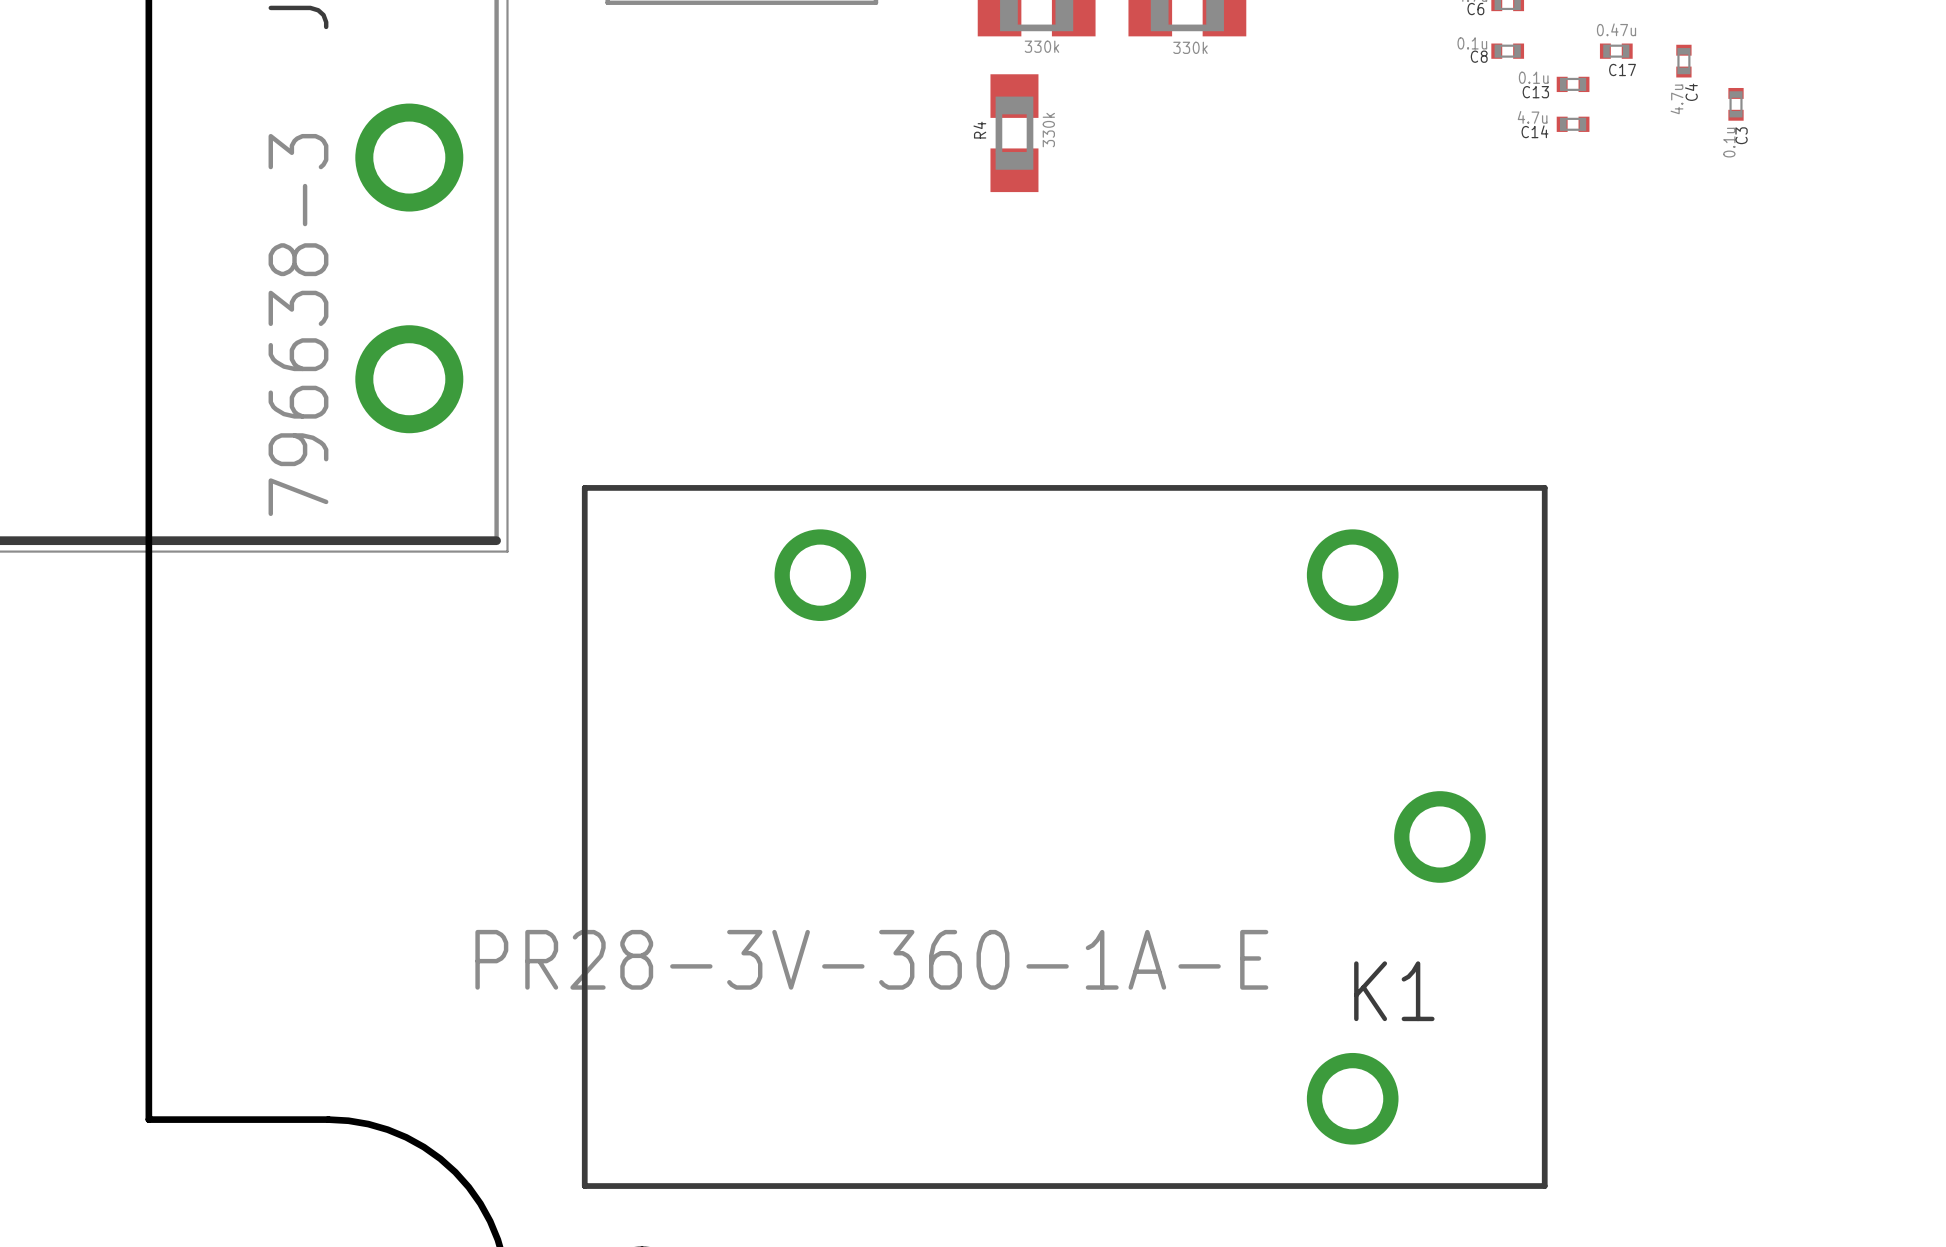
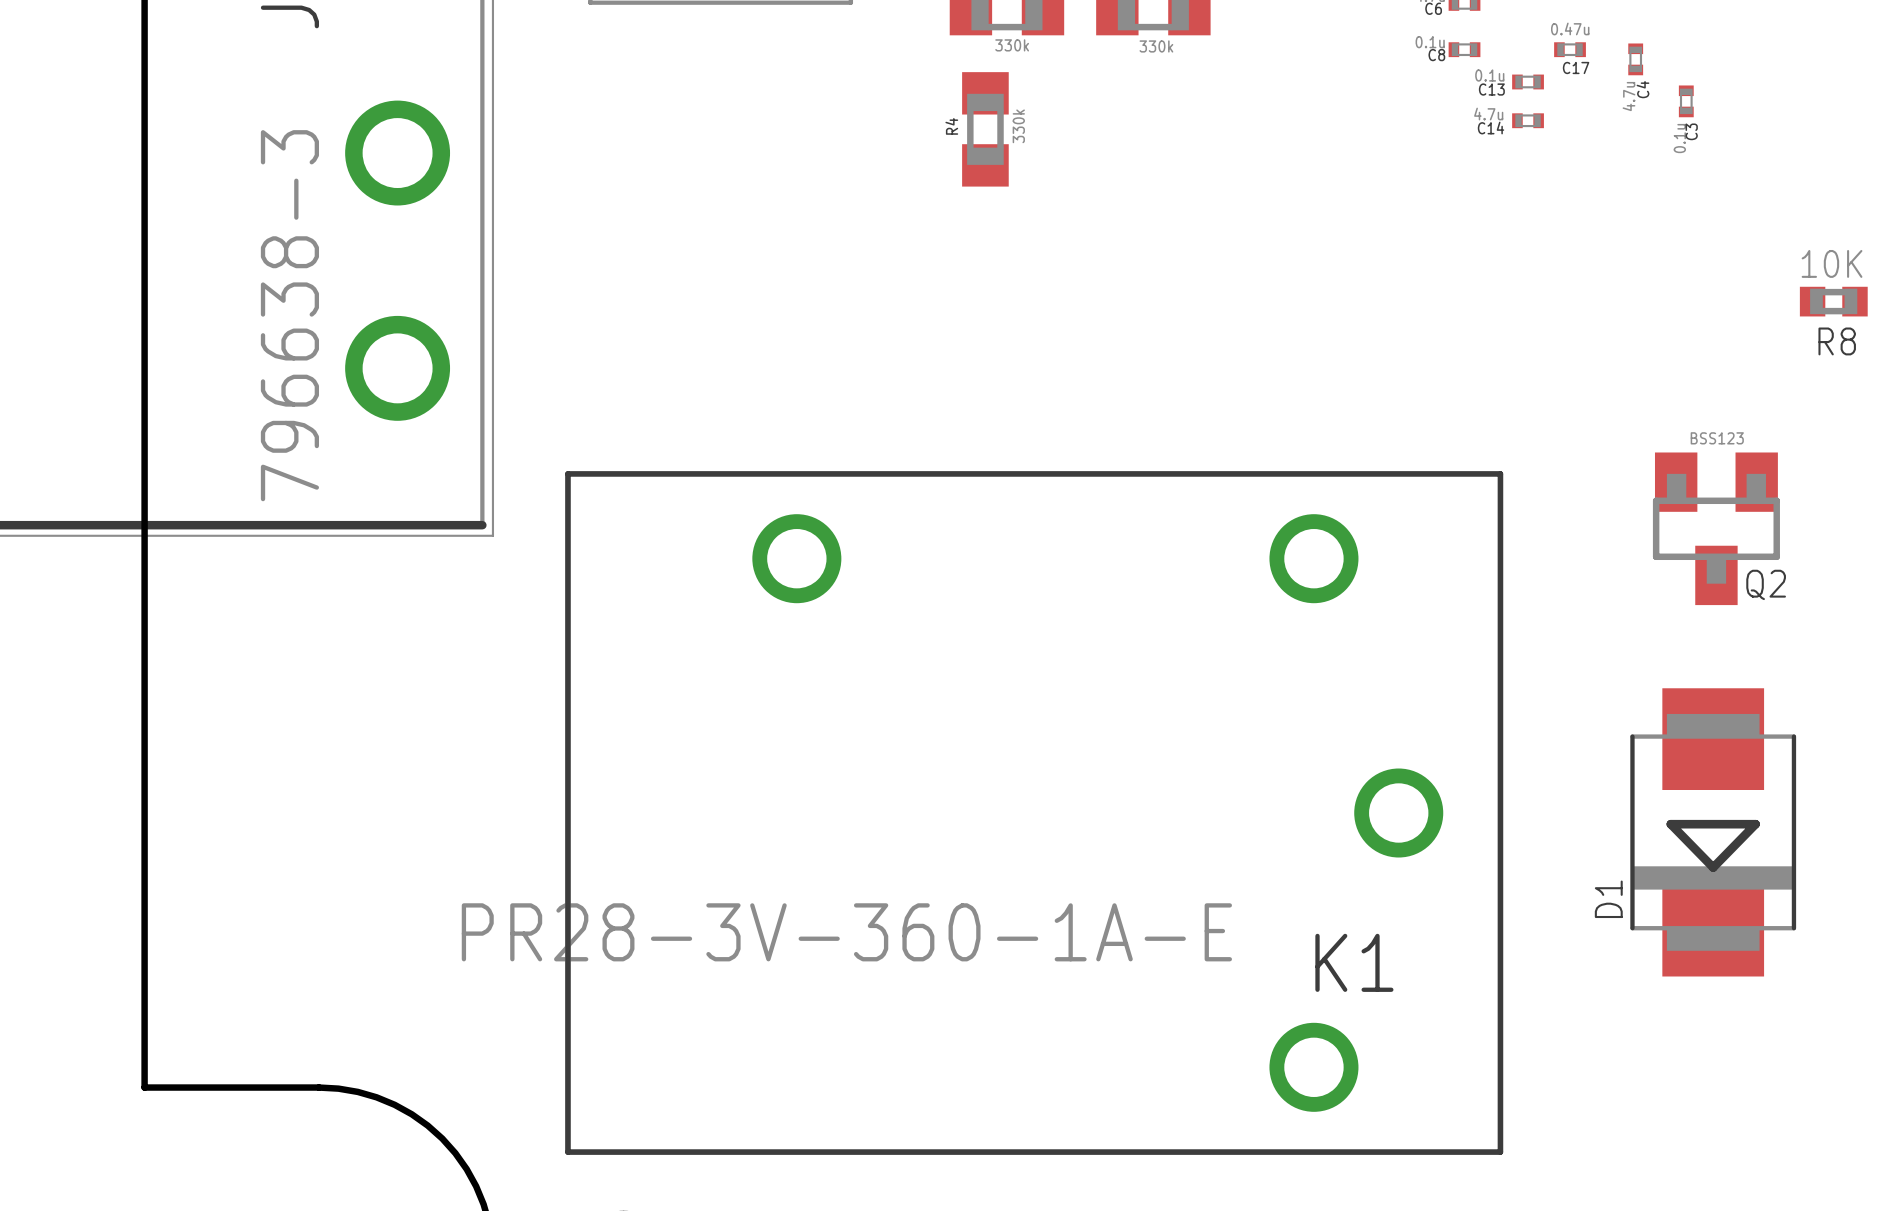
R8: none -> 10K (1833, 301)
Q2: none -> BSS123 (1716, 528)
D1: none -> (1713, 832)

